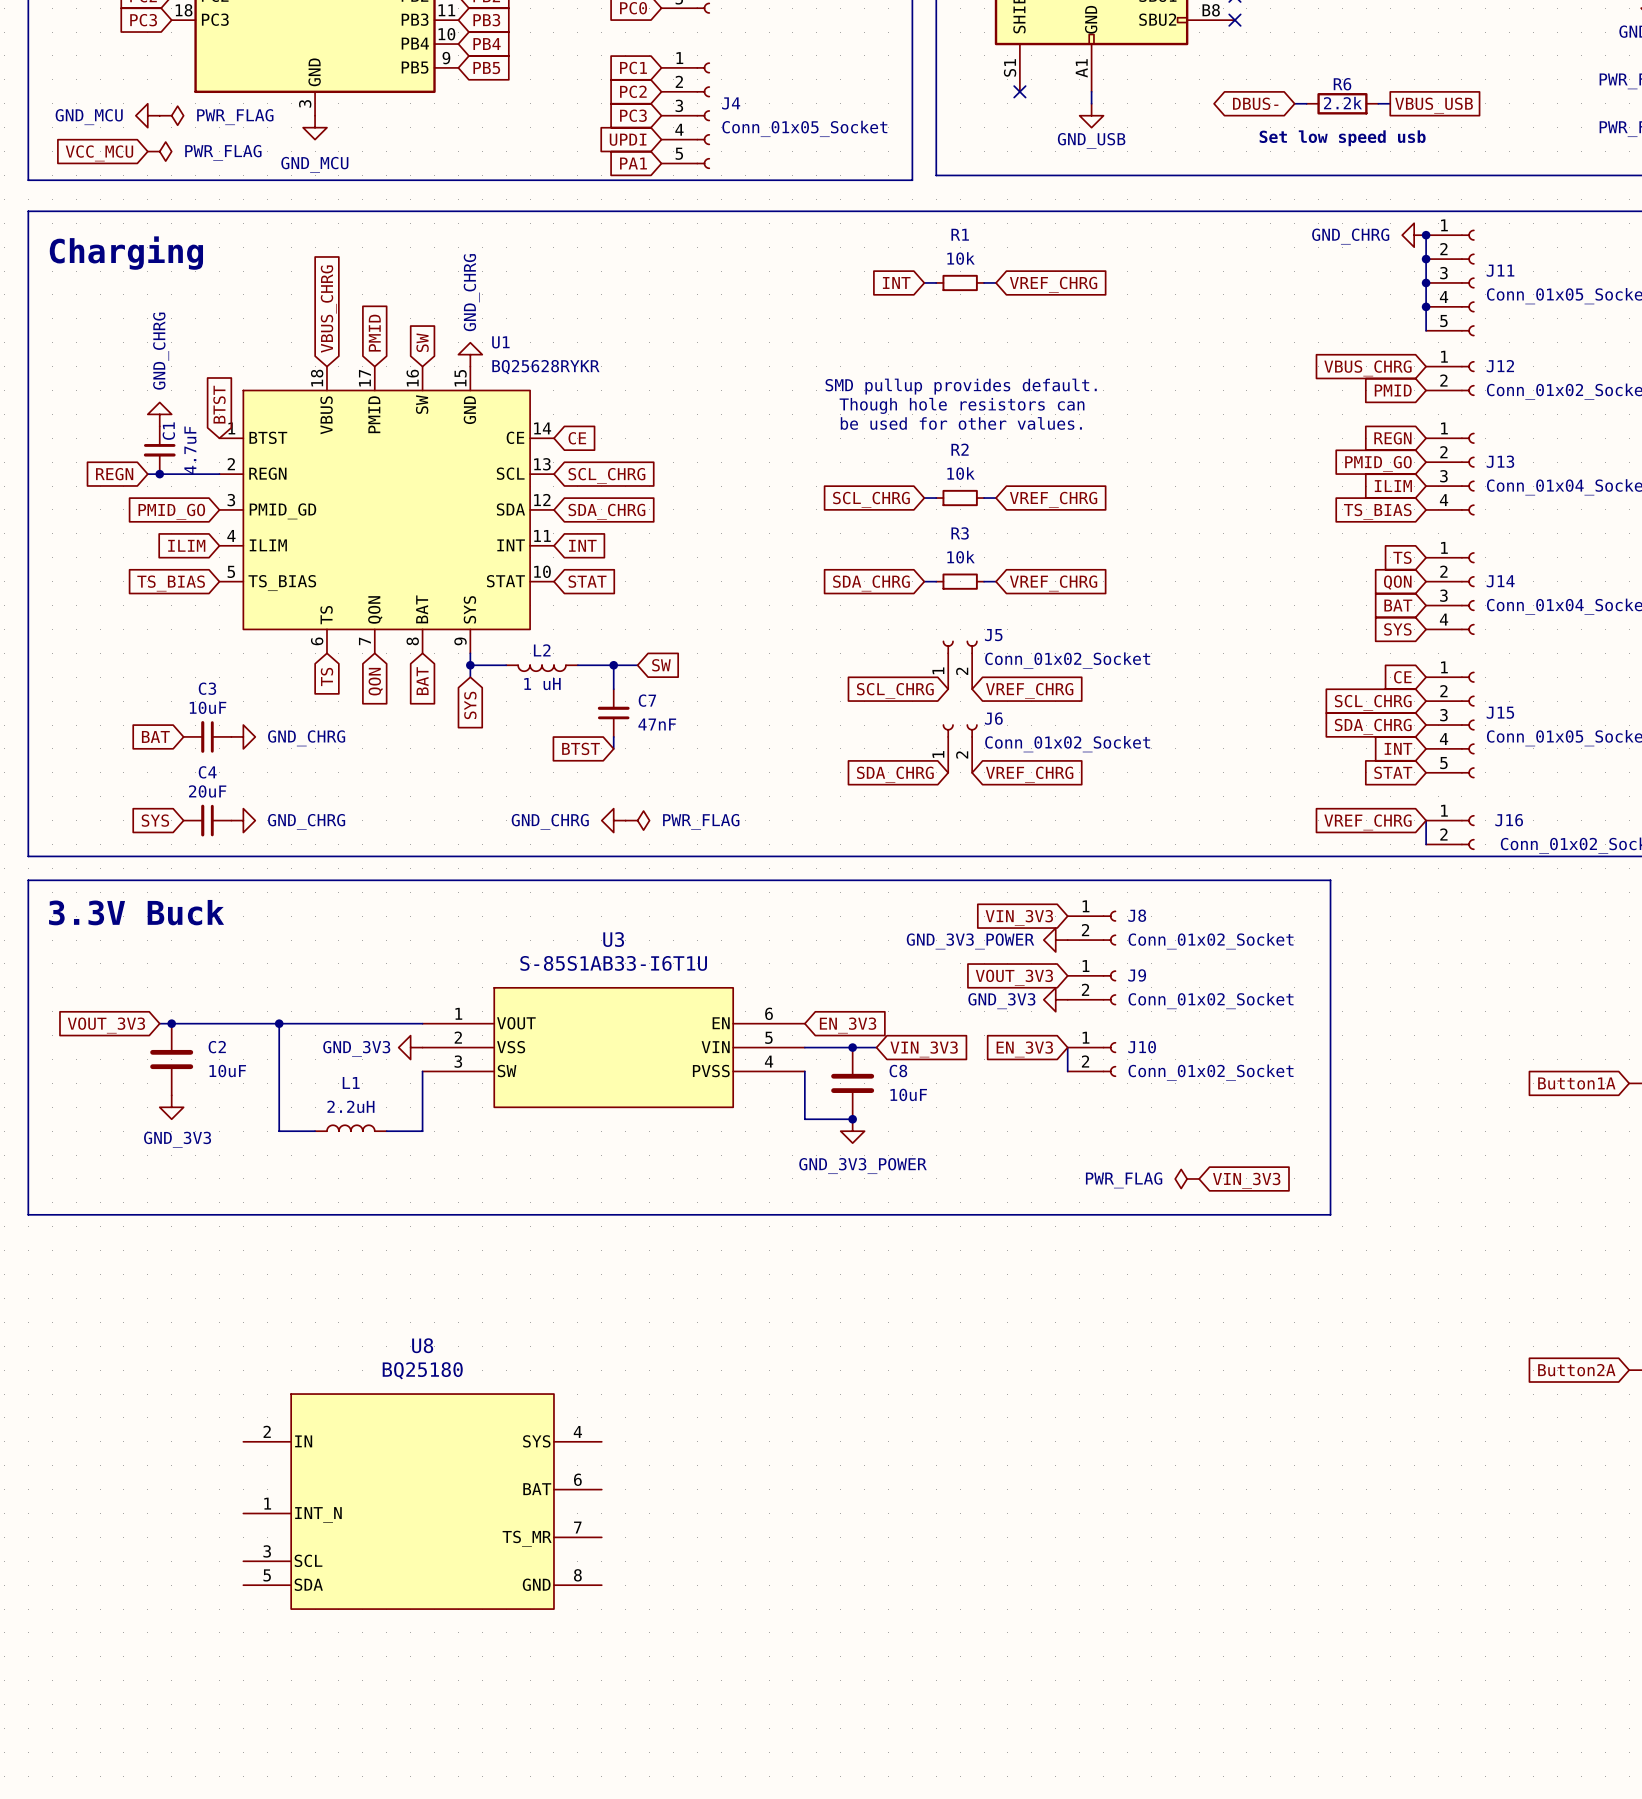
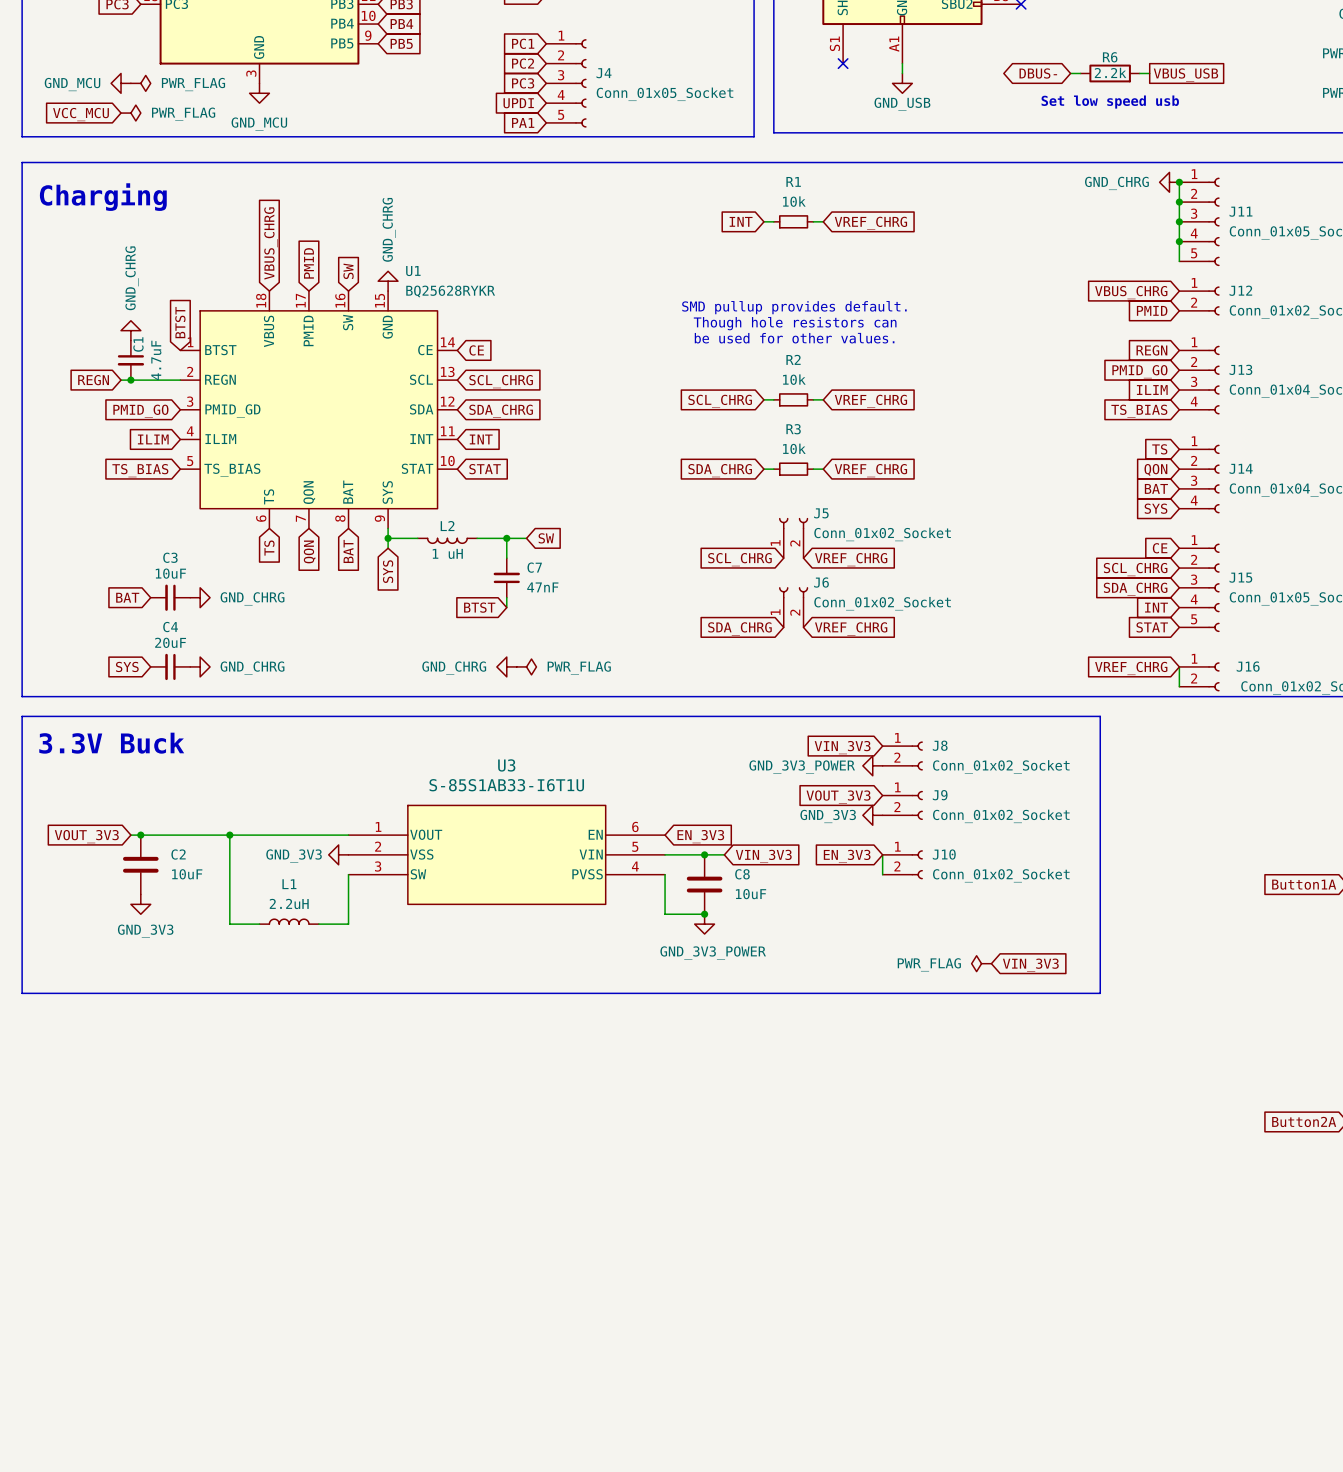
U8: BQ25180 (422, 1501) -> none

